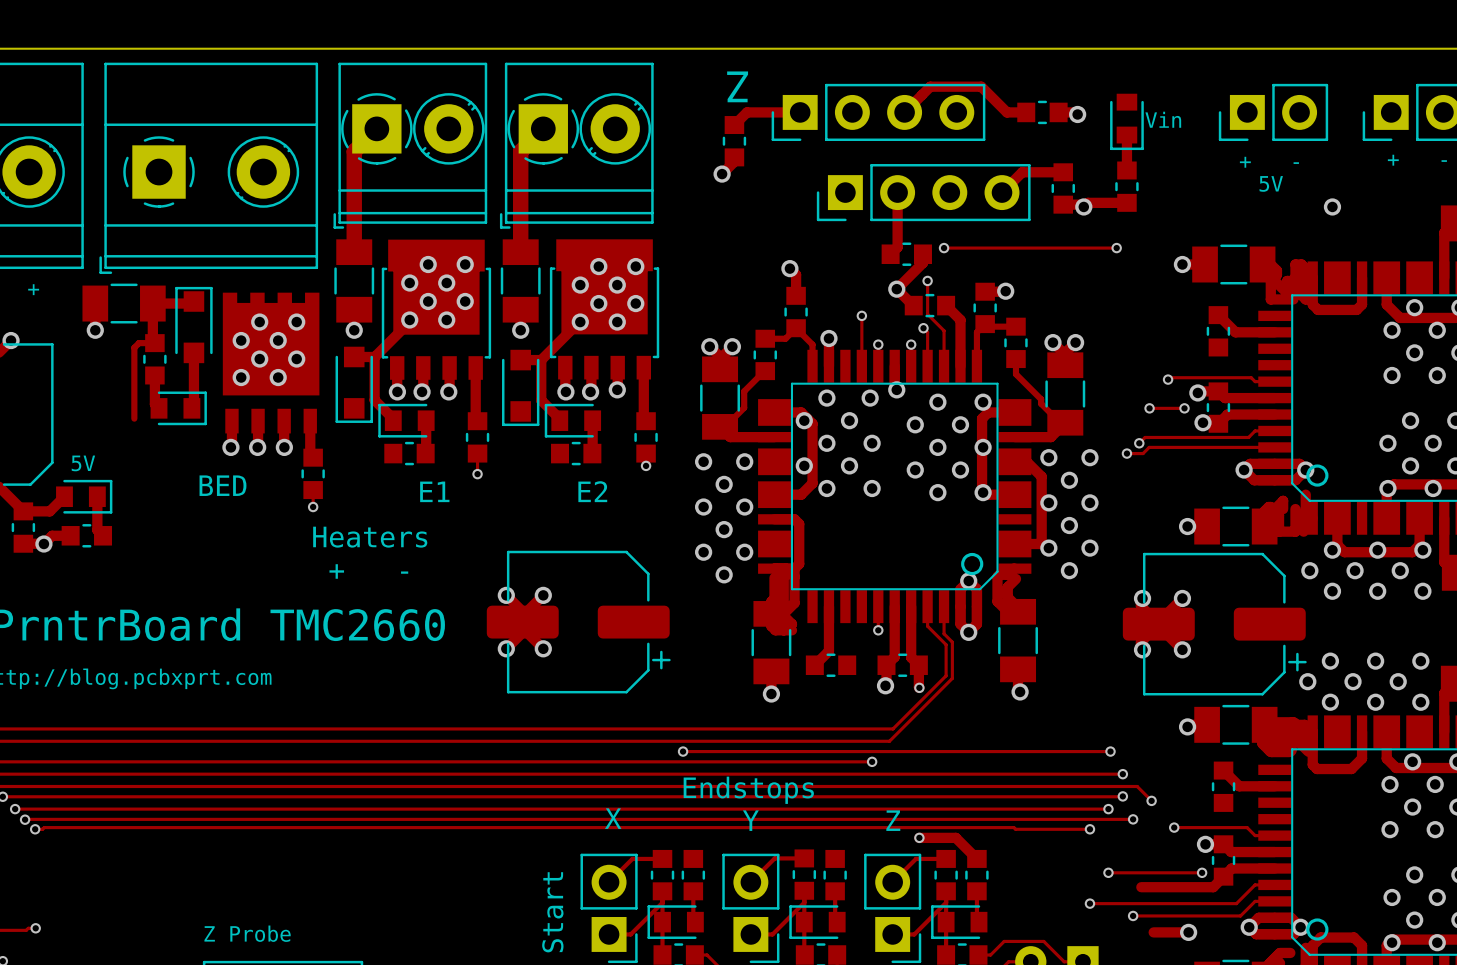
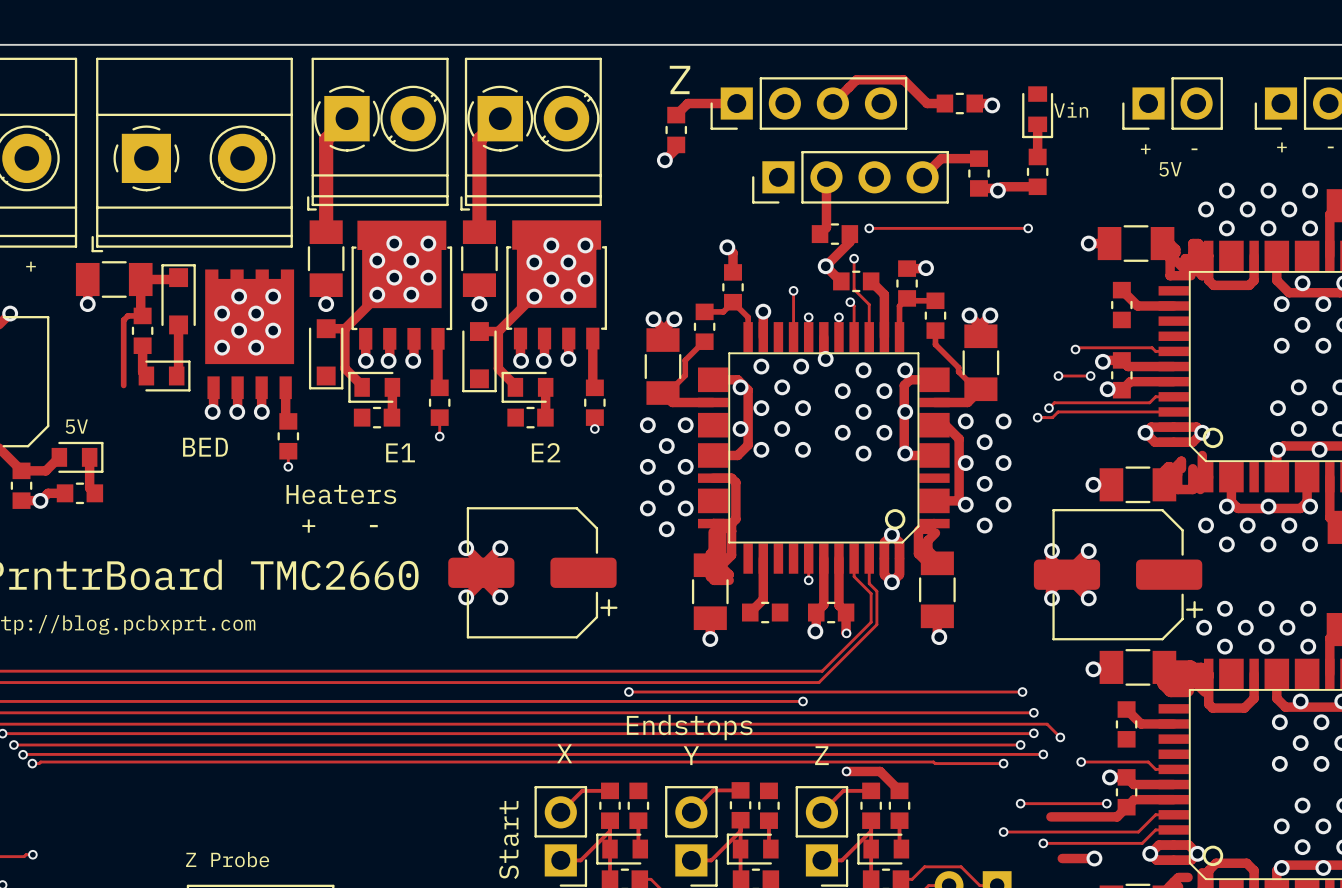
via: none -> (1268, 190)
via: none -> (1310, 190)
via: none -> (1206, 209)
via: none -> (1247, 209)
via: none -> (1289, 209)
via: none -> (1226, 228)
via: none -> (1268, 228)
via: none -> (1310, 228)

